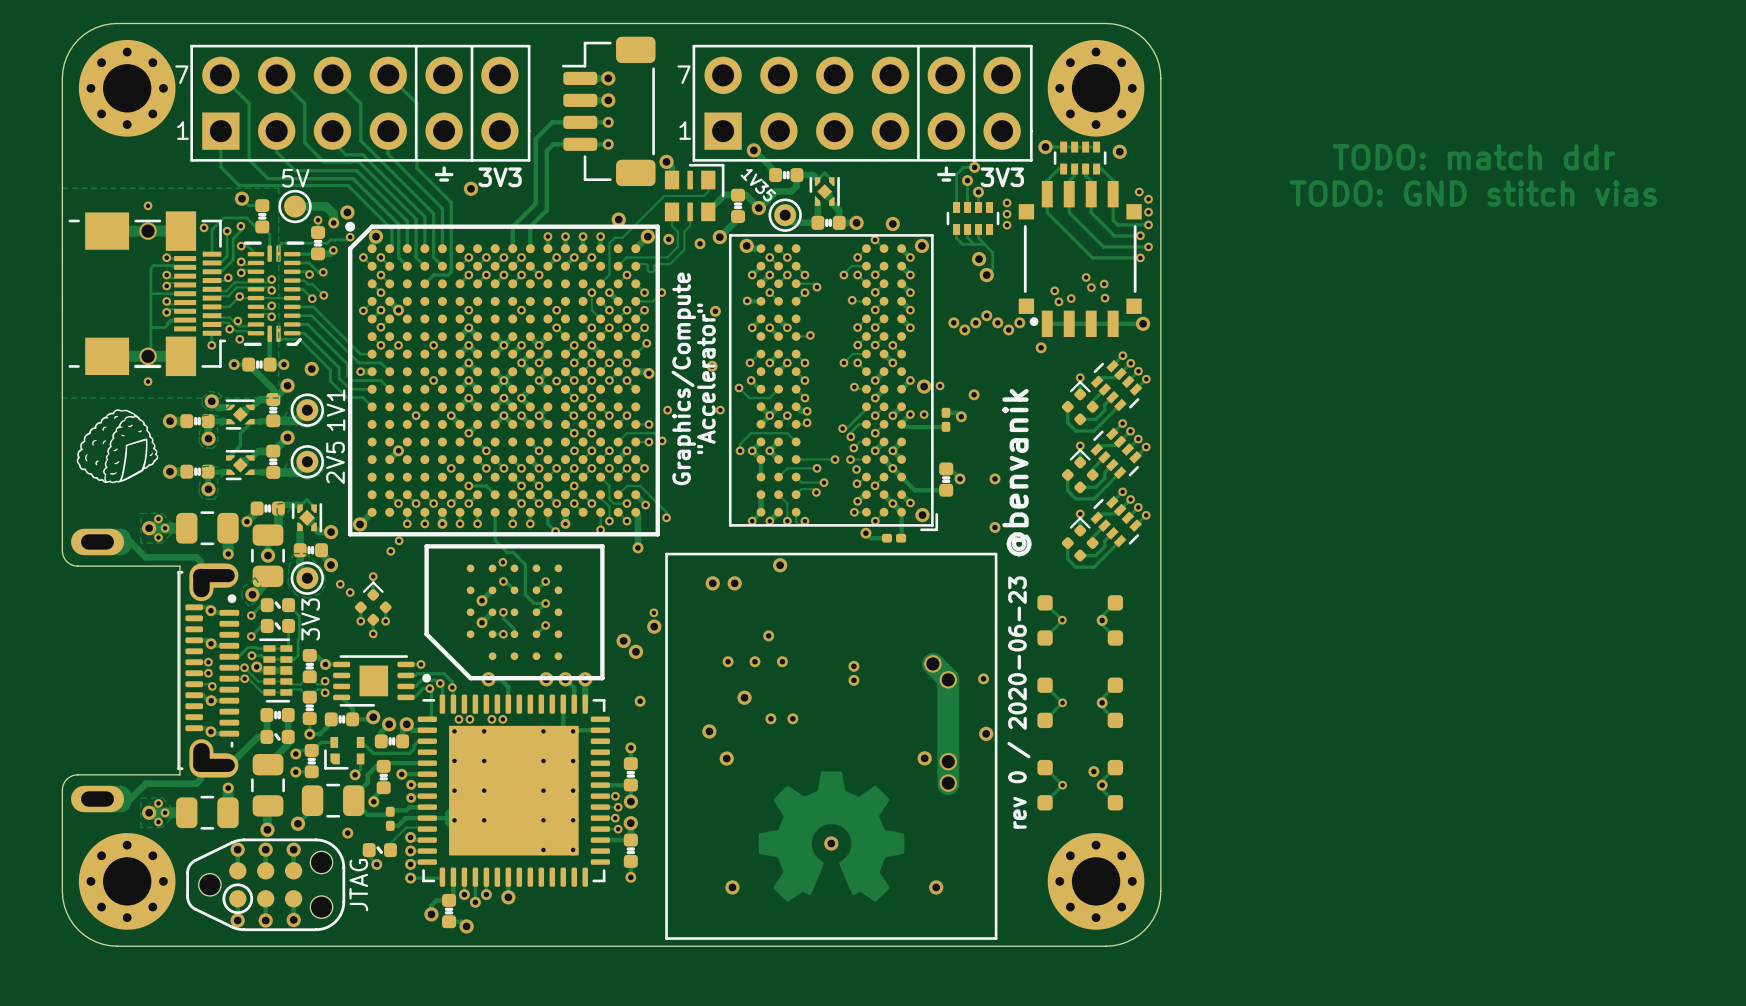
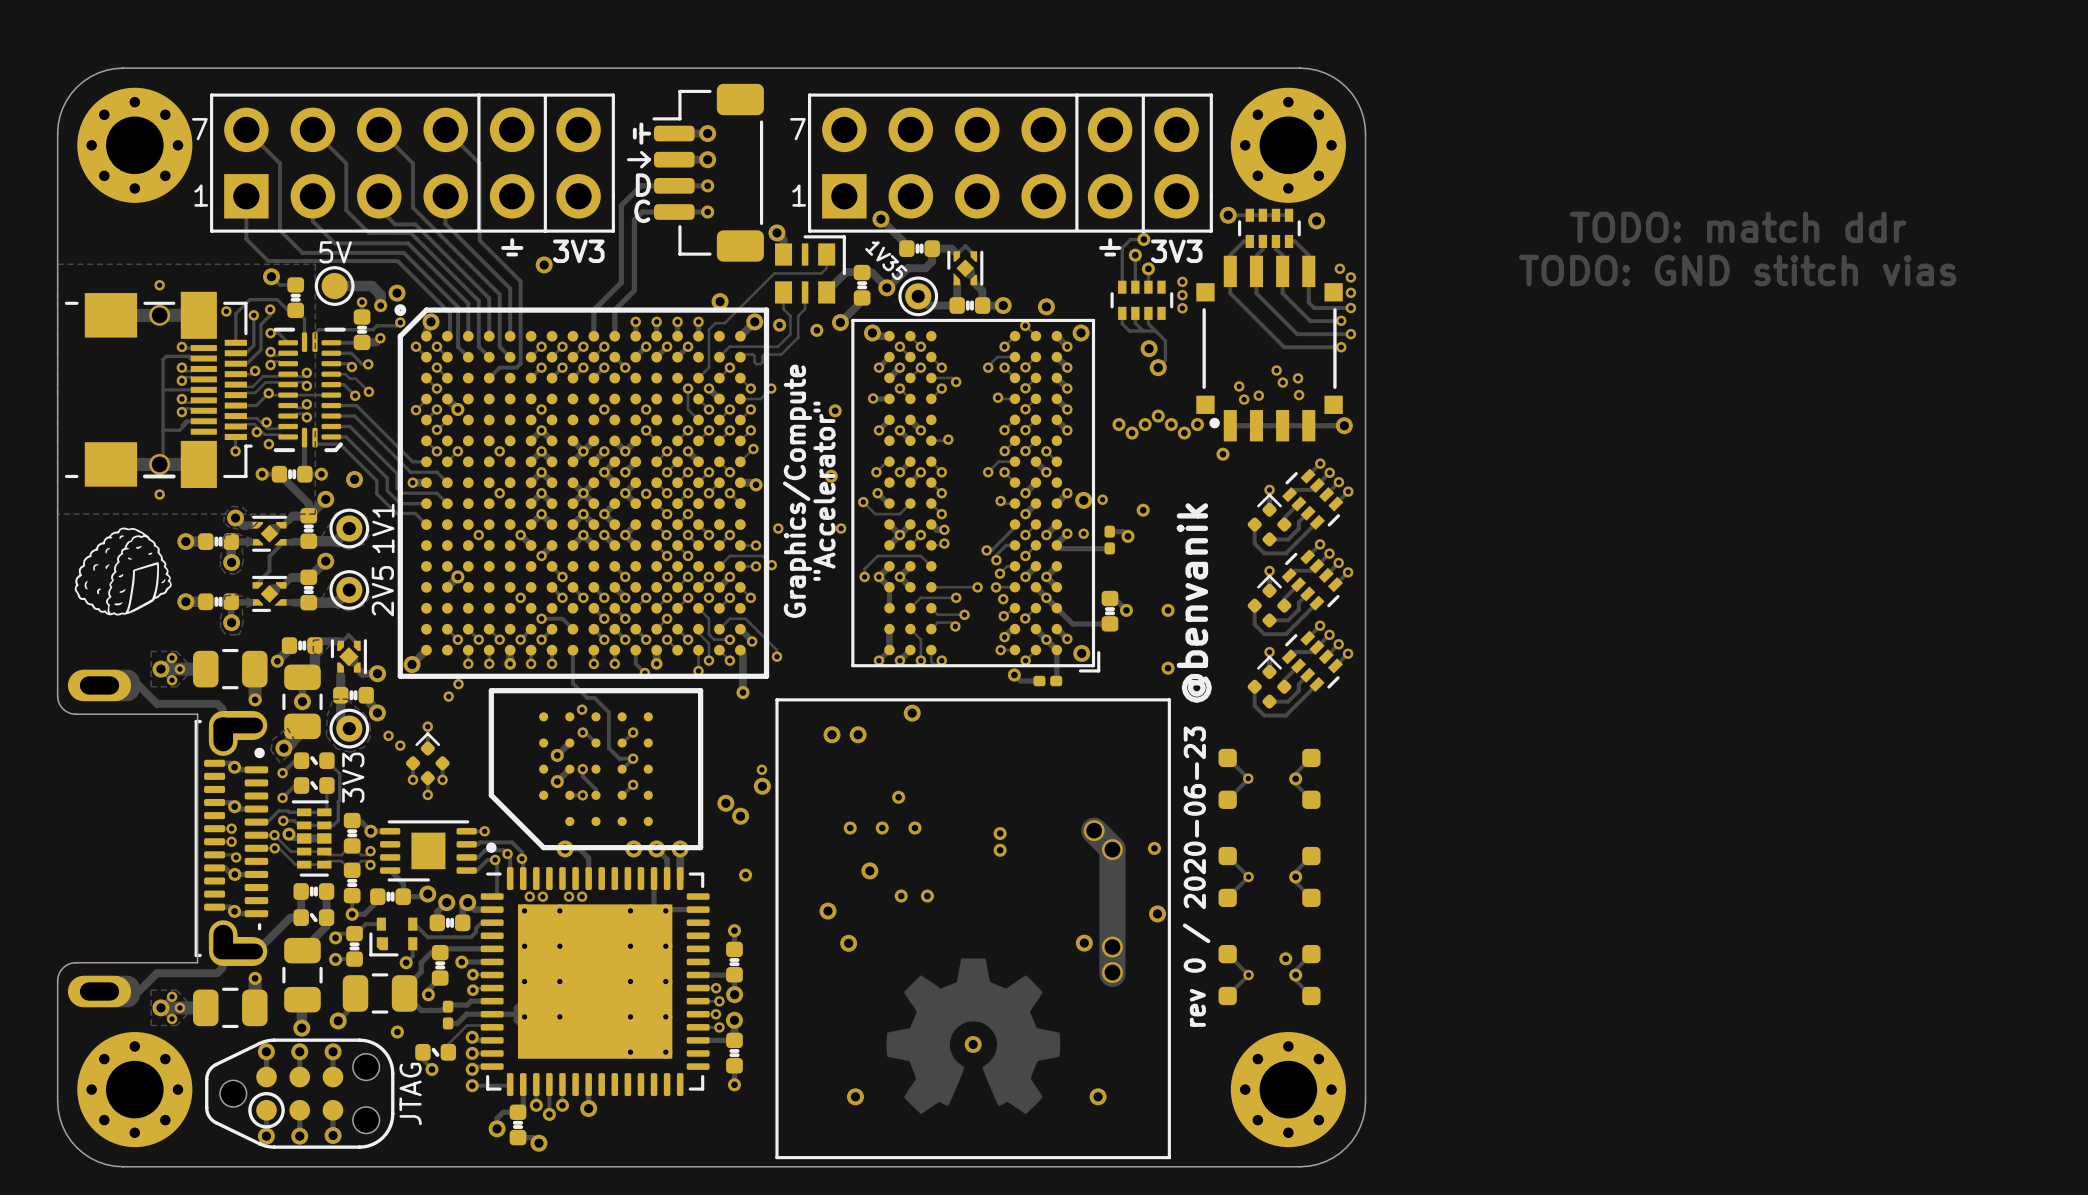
part footprint: [561, 36, 656, 187] -> [626, 83, 764, 262]

